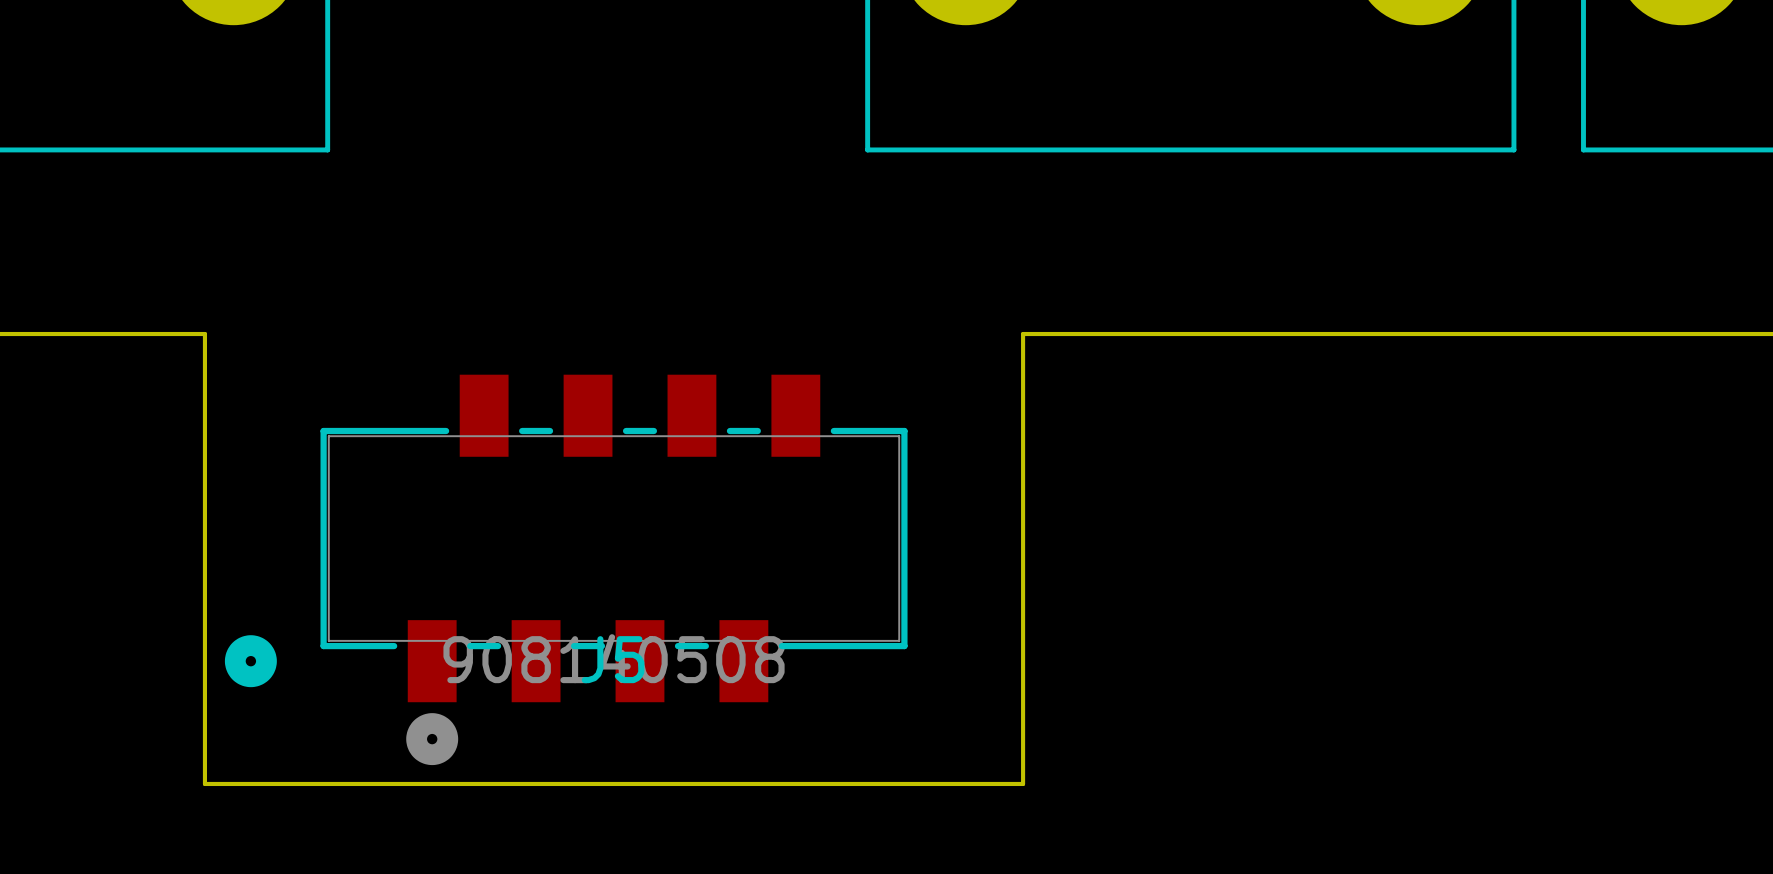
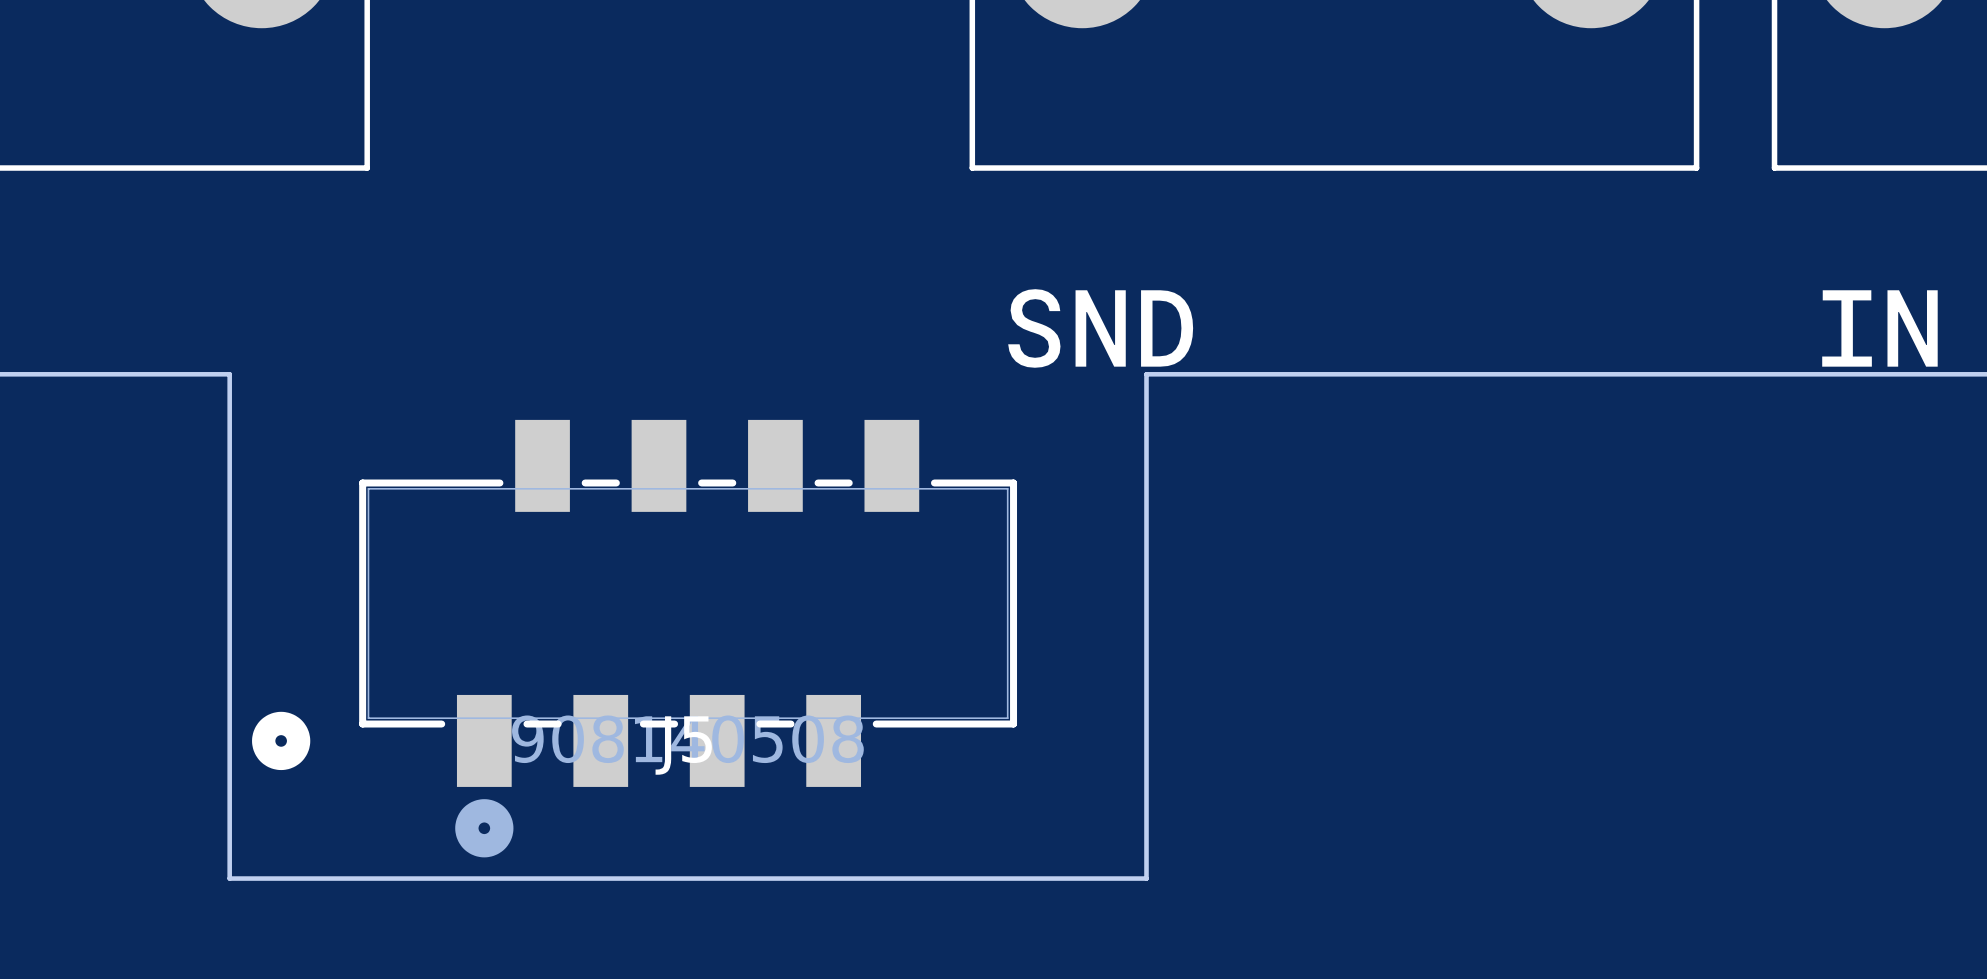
drawing: none -> [1008, 289, 1194, 368]
drawing: none -> [1822, 290, 1938, 367]

